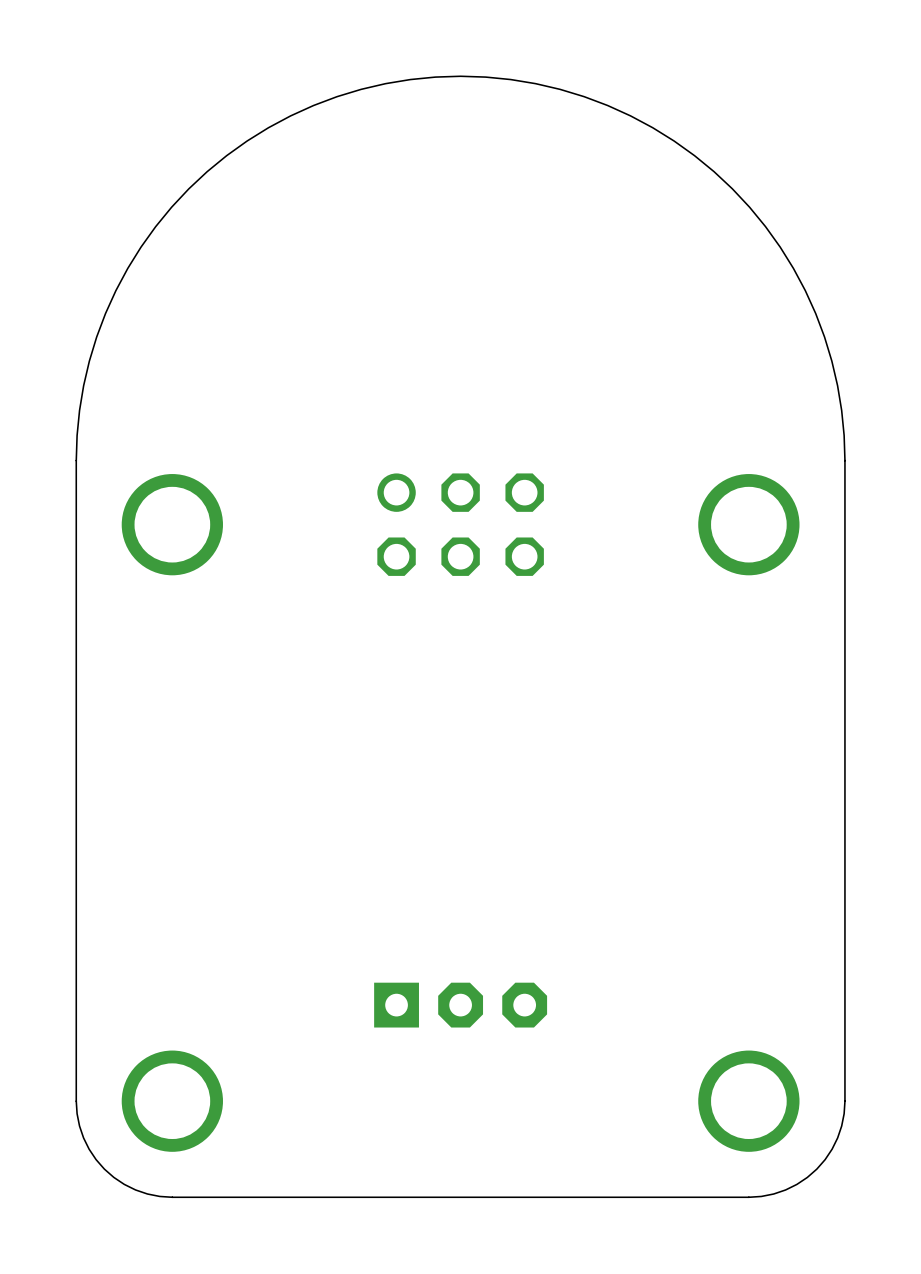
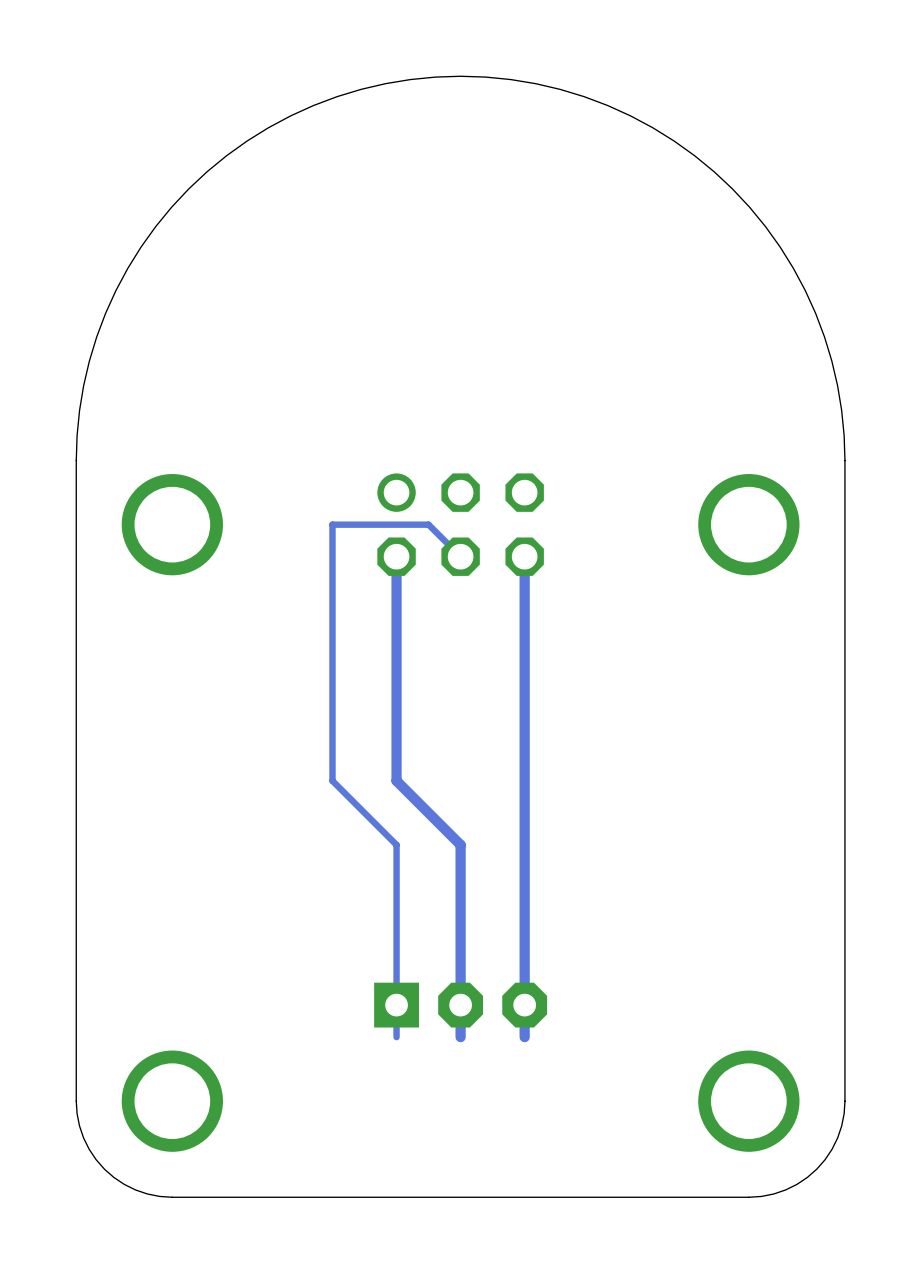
track: none -> (396, 556) (396, 780) (460, 844) (460, 1037)
track: none -> (460, 556) (428, 524) (332, 524) (332, 780) (396, 844) (396, 1037)
track: none -> (524, 556) (524, 1037)

